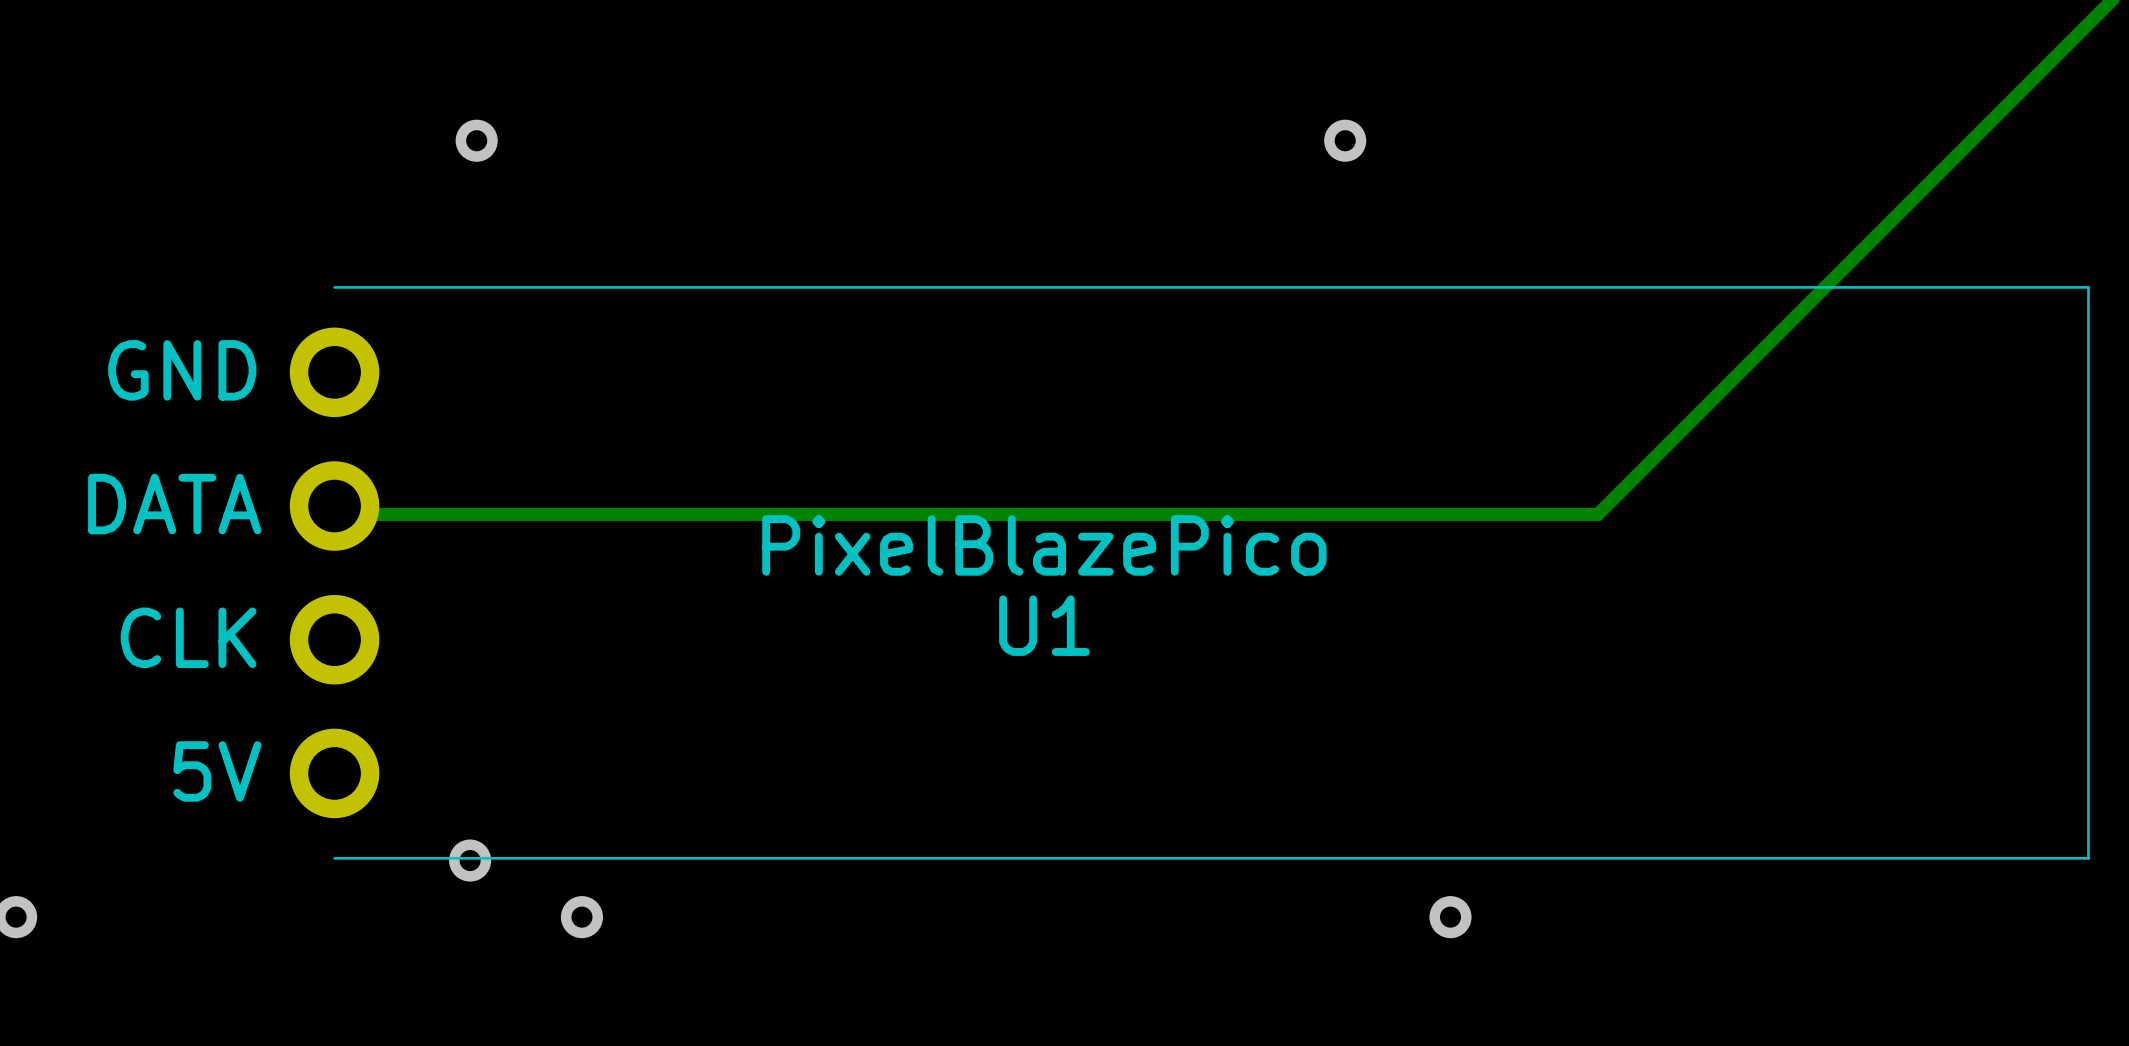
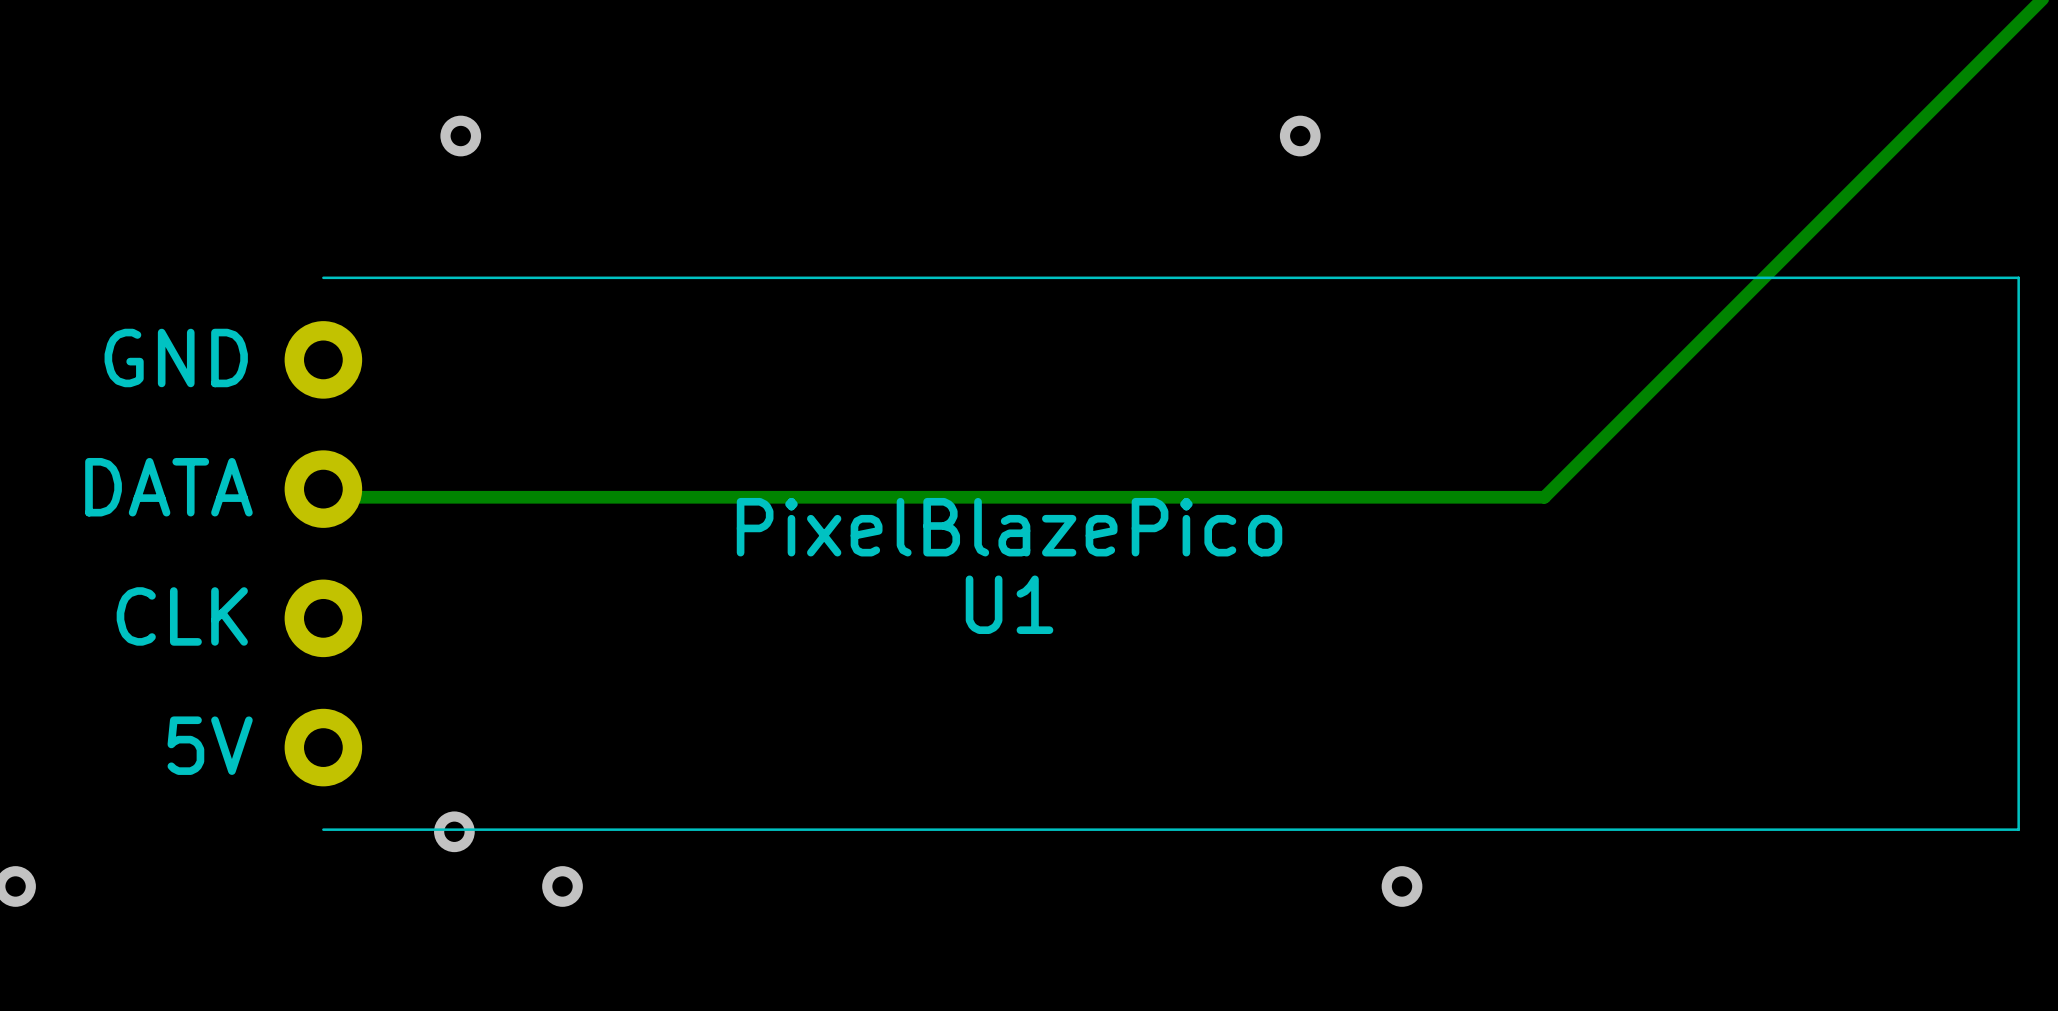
U1 footprint: [289, 286, 2090, 860] -> [284, 276, 2020, 831]

